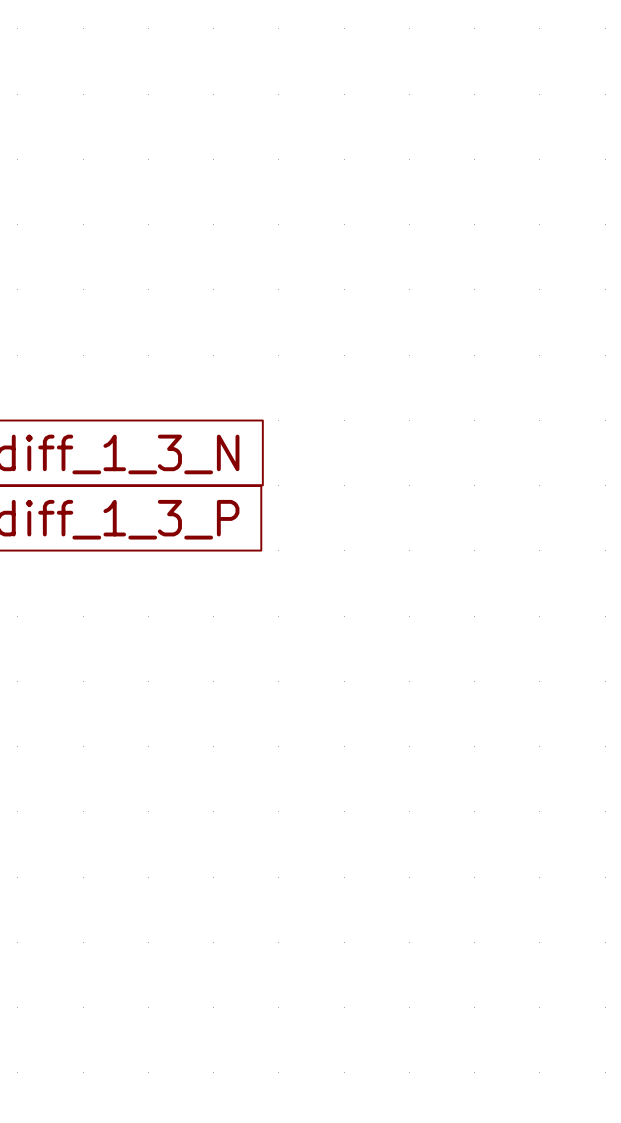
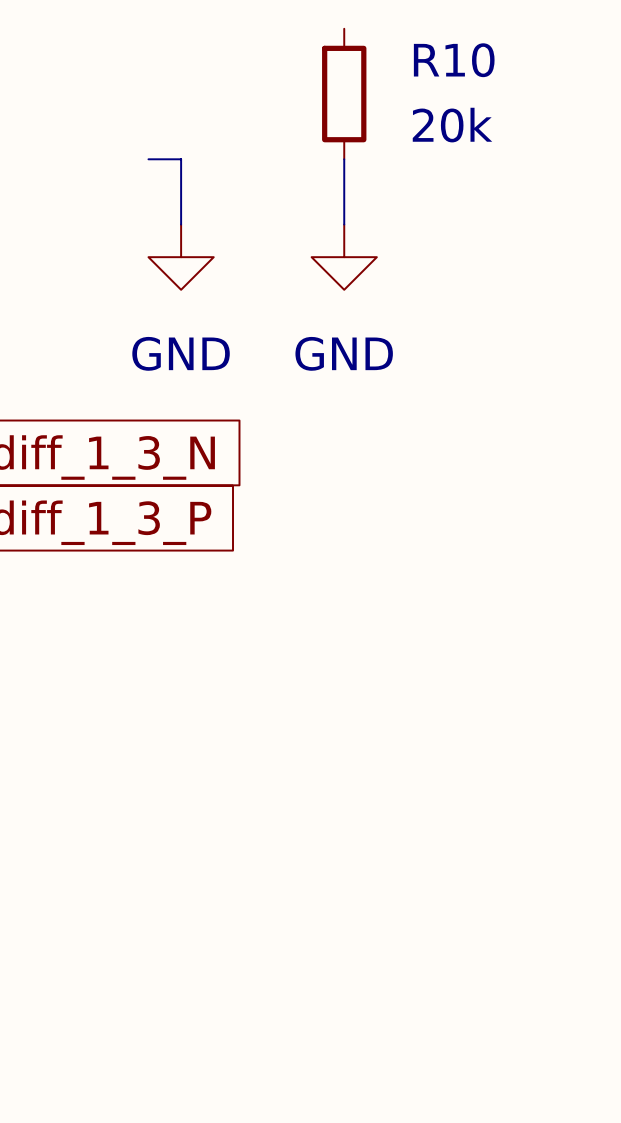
R10: none -> 20k (344, 94)
wire: none -> (148, 159) (181, 159) (181, 224)
wire: none -> (344, 159) (344, 224)
power symbol: none -> GND (181, 257)
power symbol: none -> GND (344, 257)

